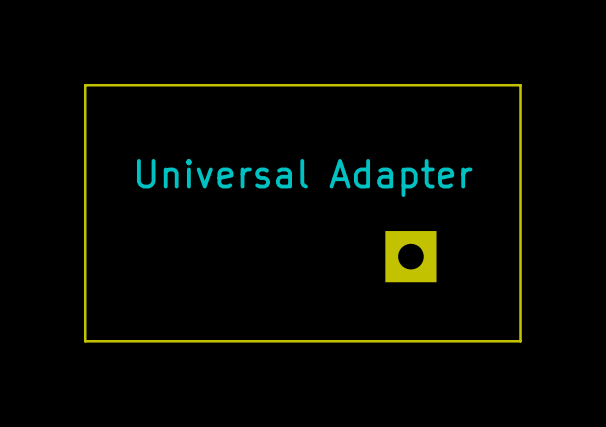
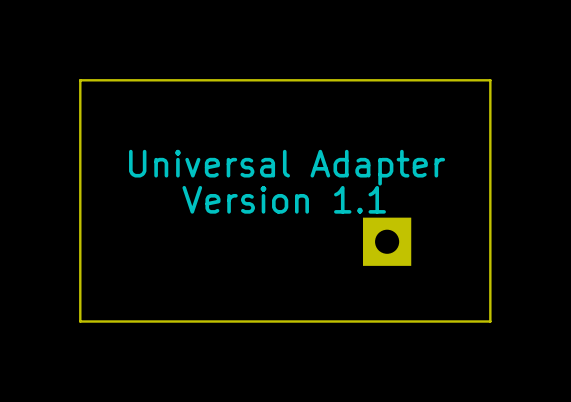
text: none -> Version 1.1 (284, 199)

